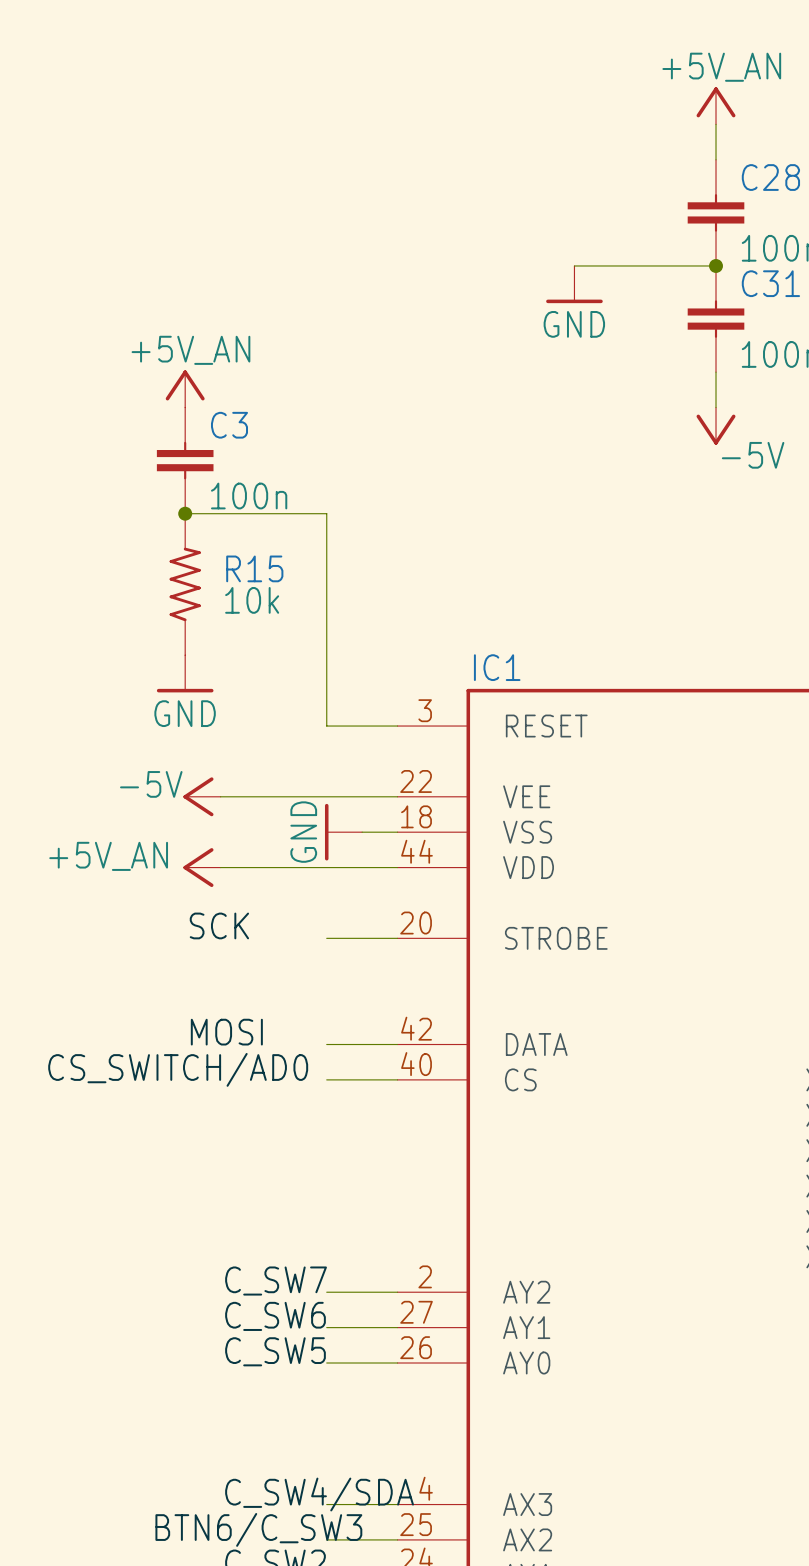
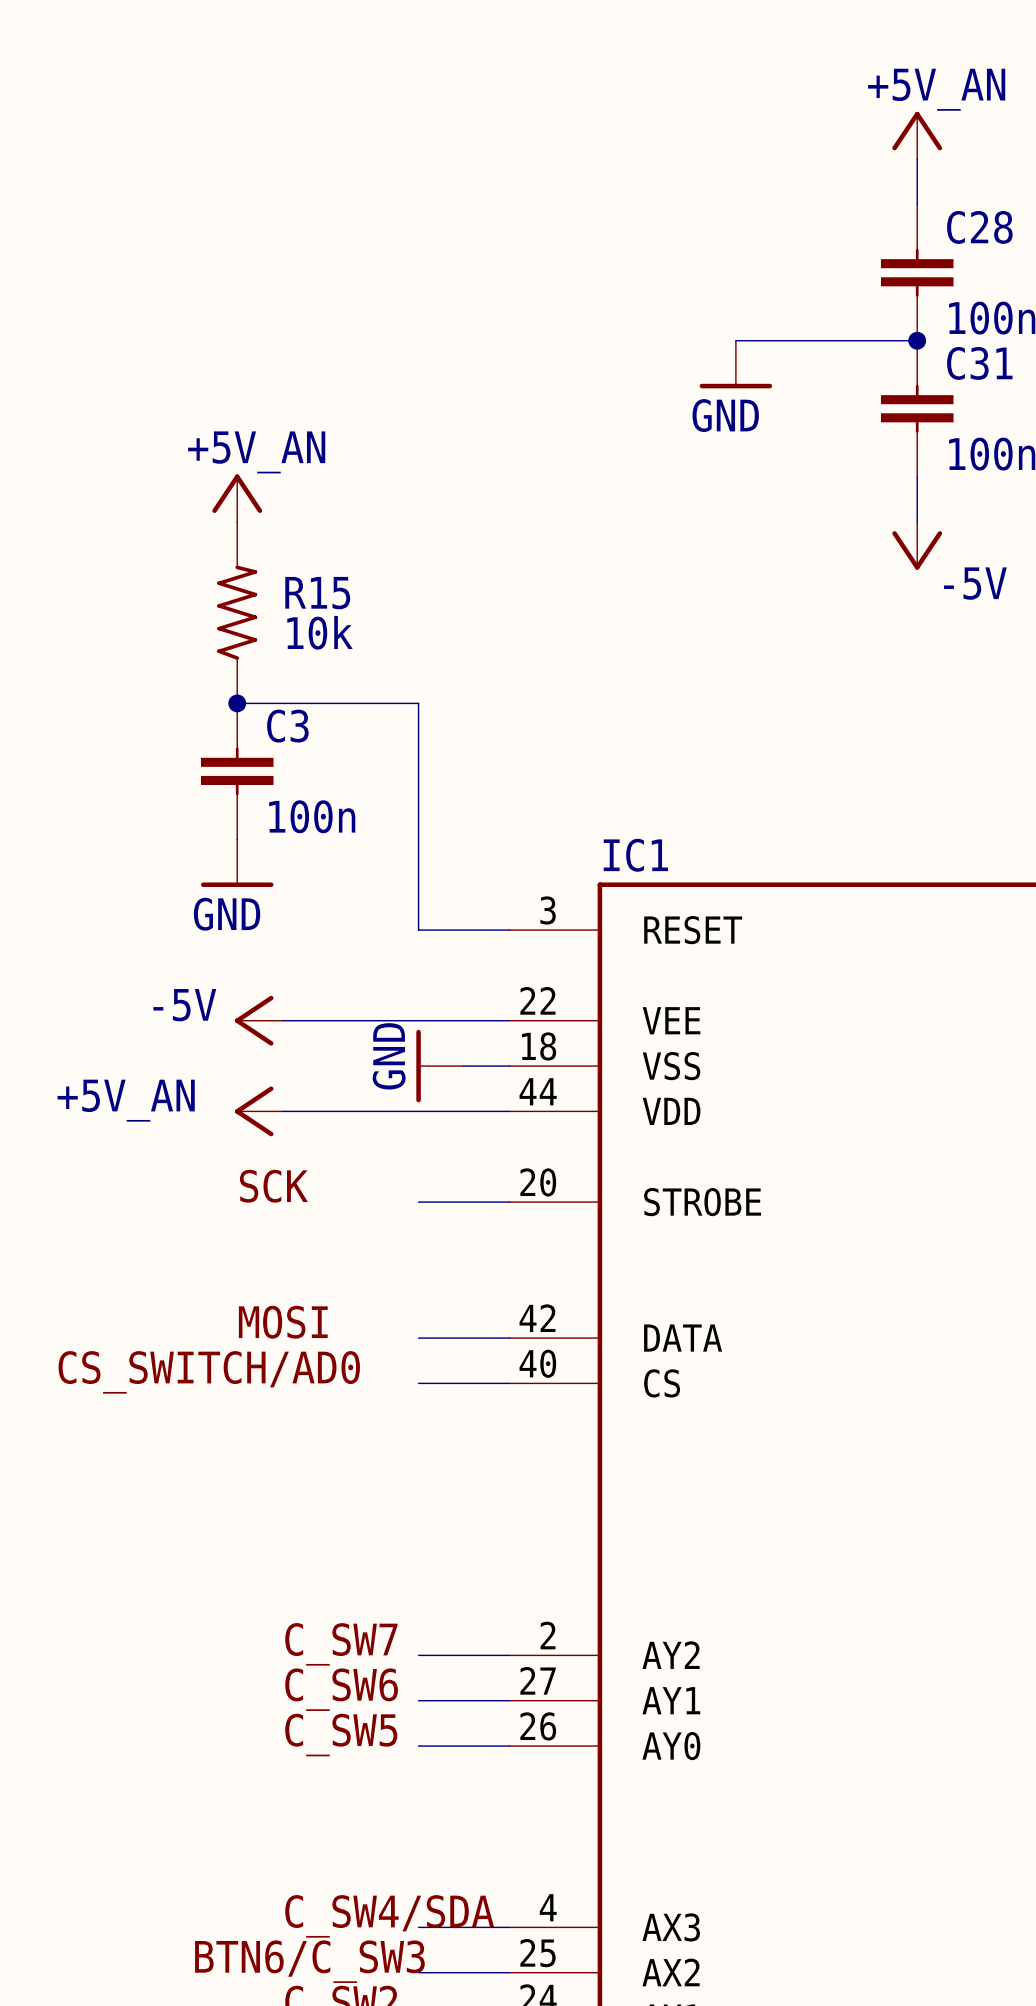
C3 position: (185, 460) -> (237, 771)
wire: (185, 513) (326, 513) (326, 549) -> (237, 703) (418, 703)
junction position: (185, 513) -> (237, 703)
R15 position: (185, 584) -> (237, 612)

